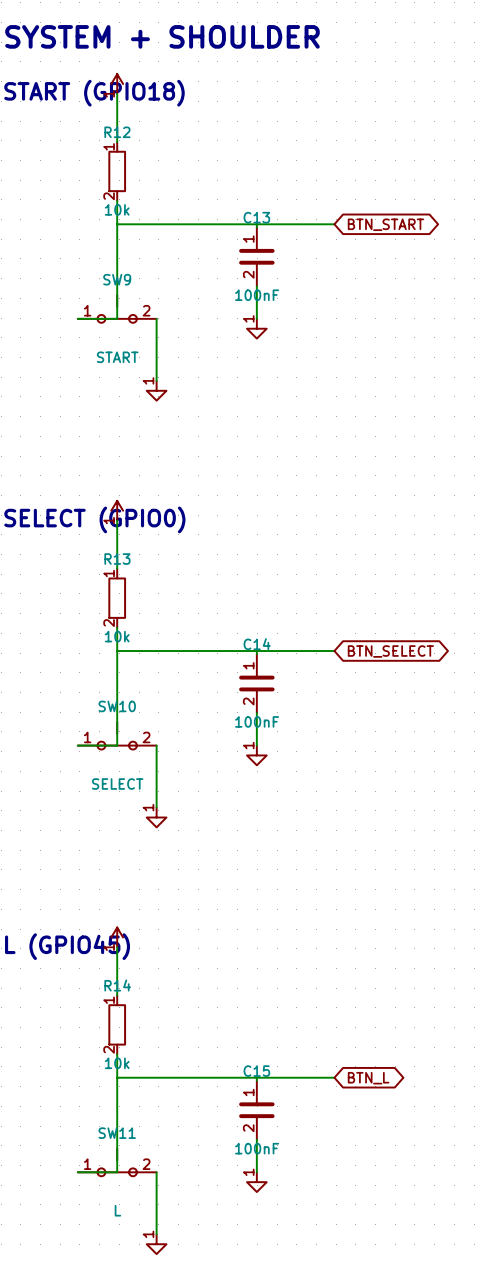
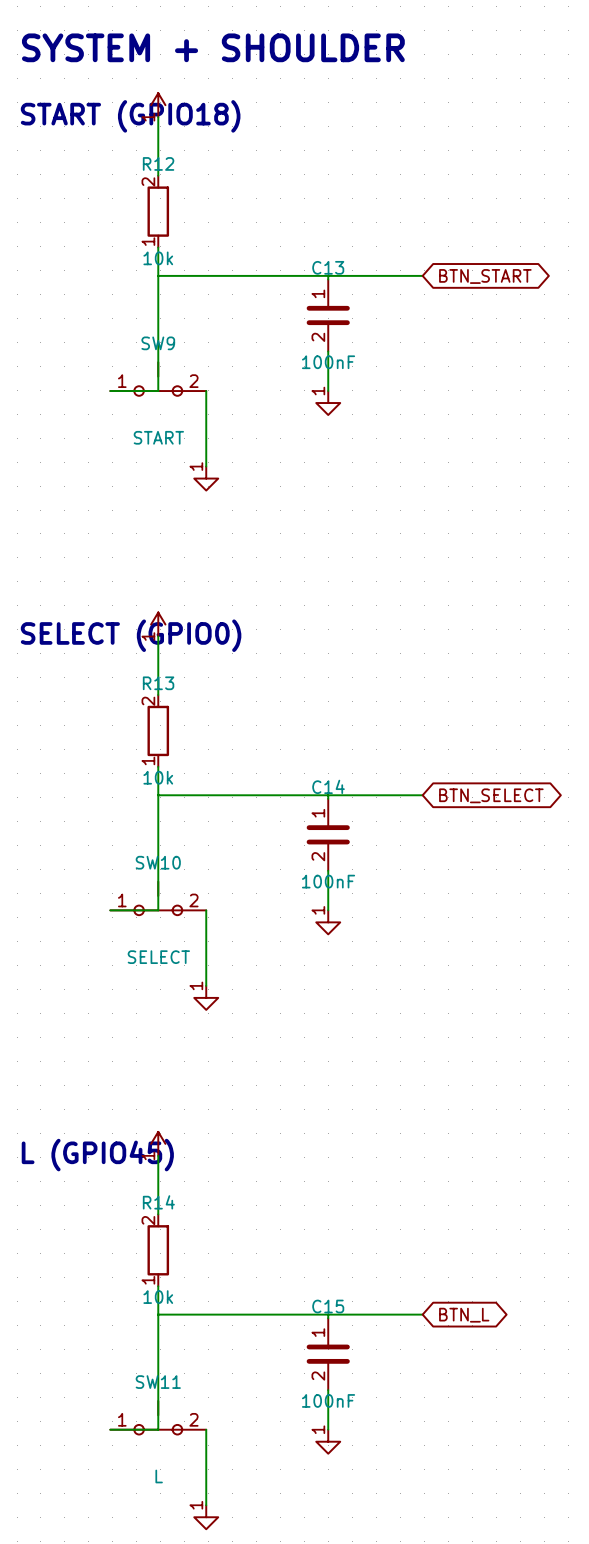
R12 rotation: 0° (117, 171) -> 180° (158, 211)
R13 rotation: 0° (117, 598) -> 180° (158, 730)
R14 rotation: 0° (117, 1024) -> 180° (158, 1250)

